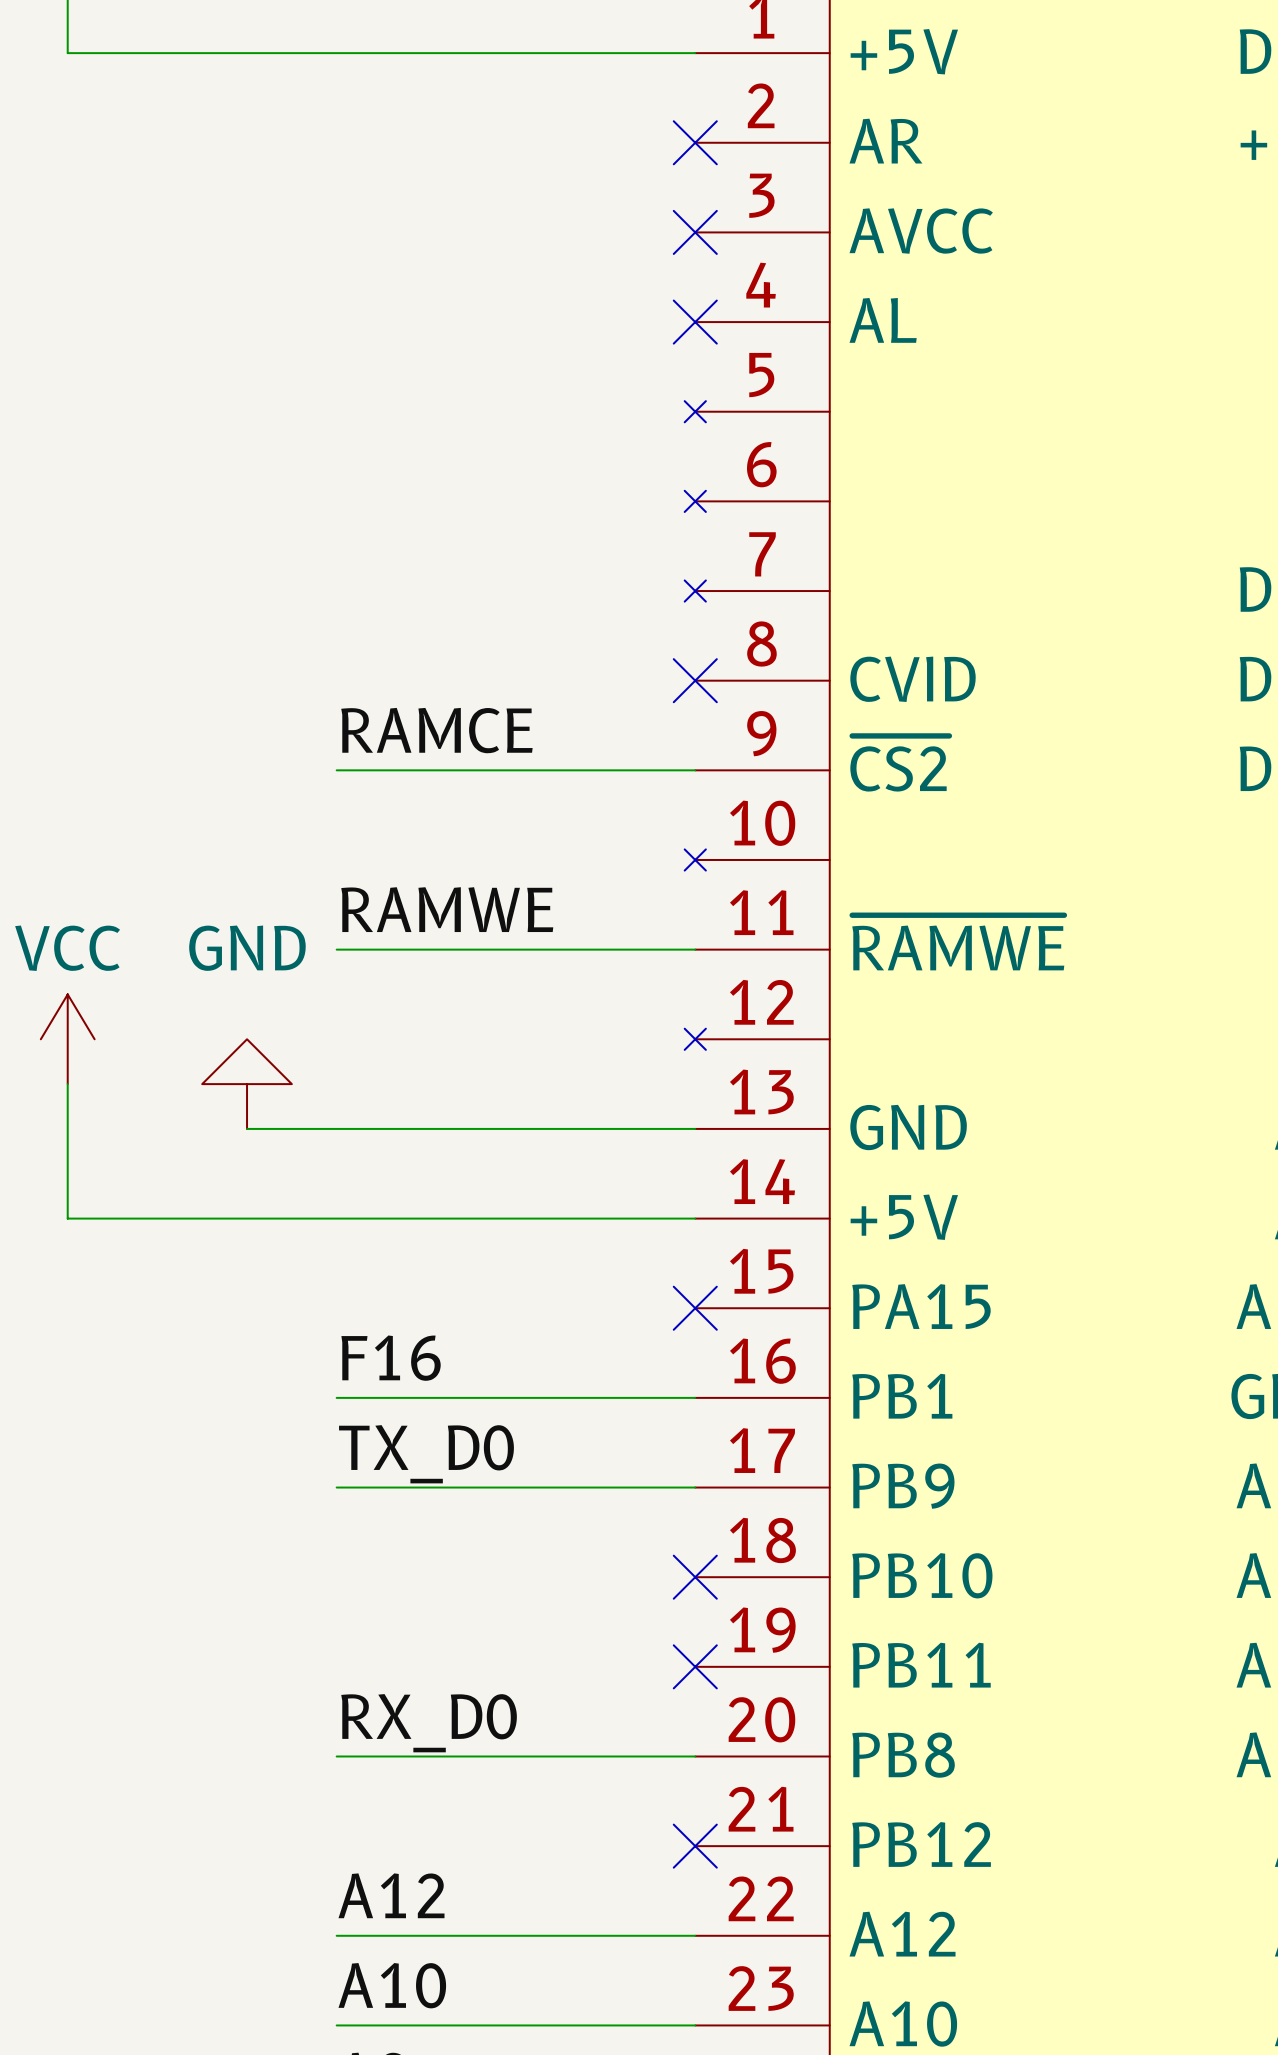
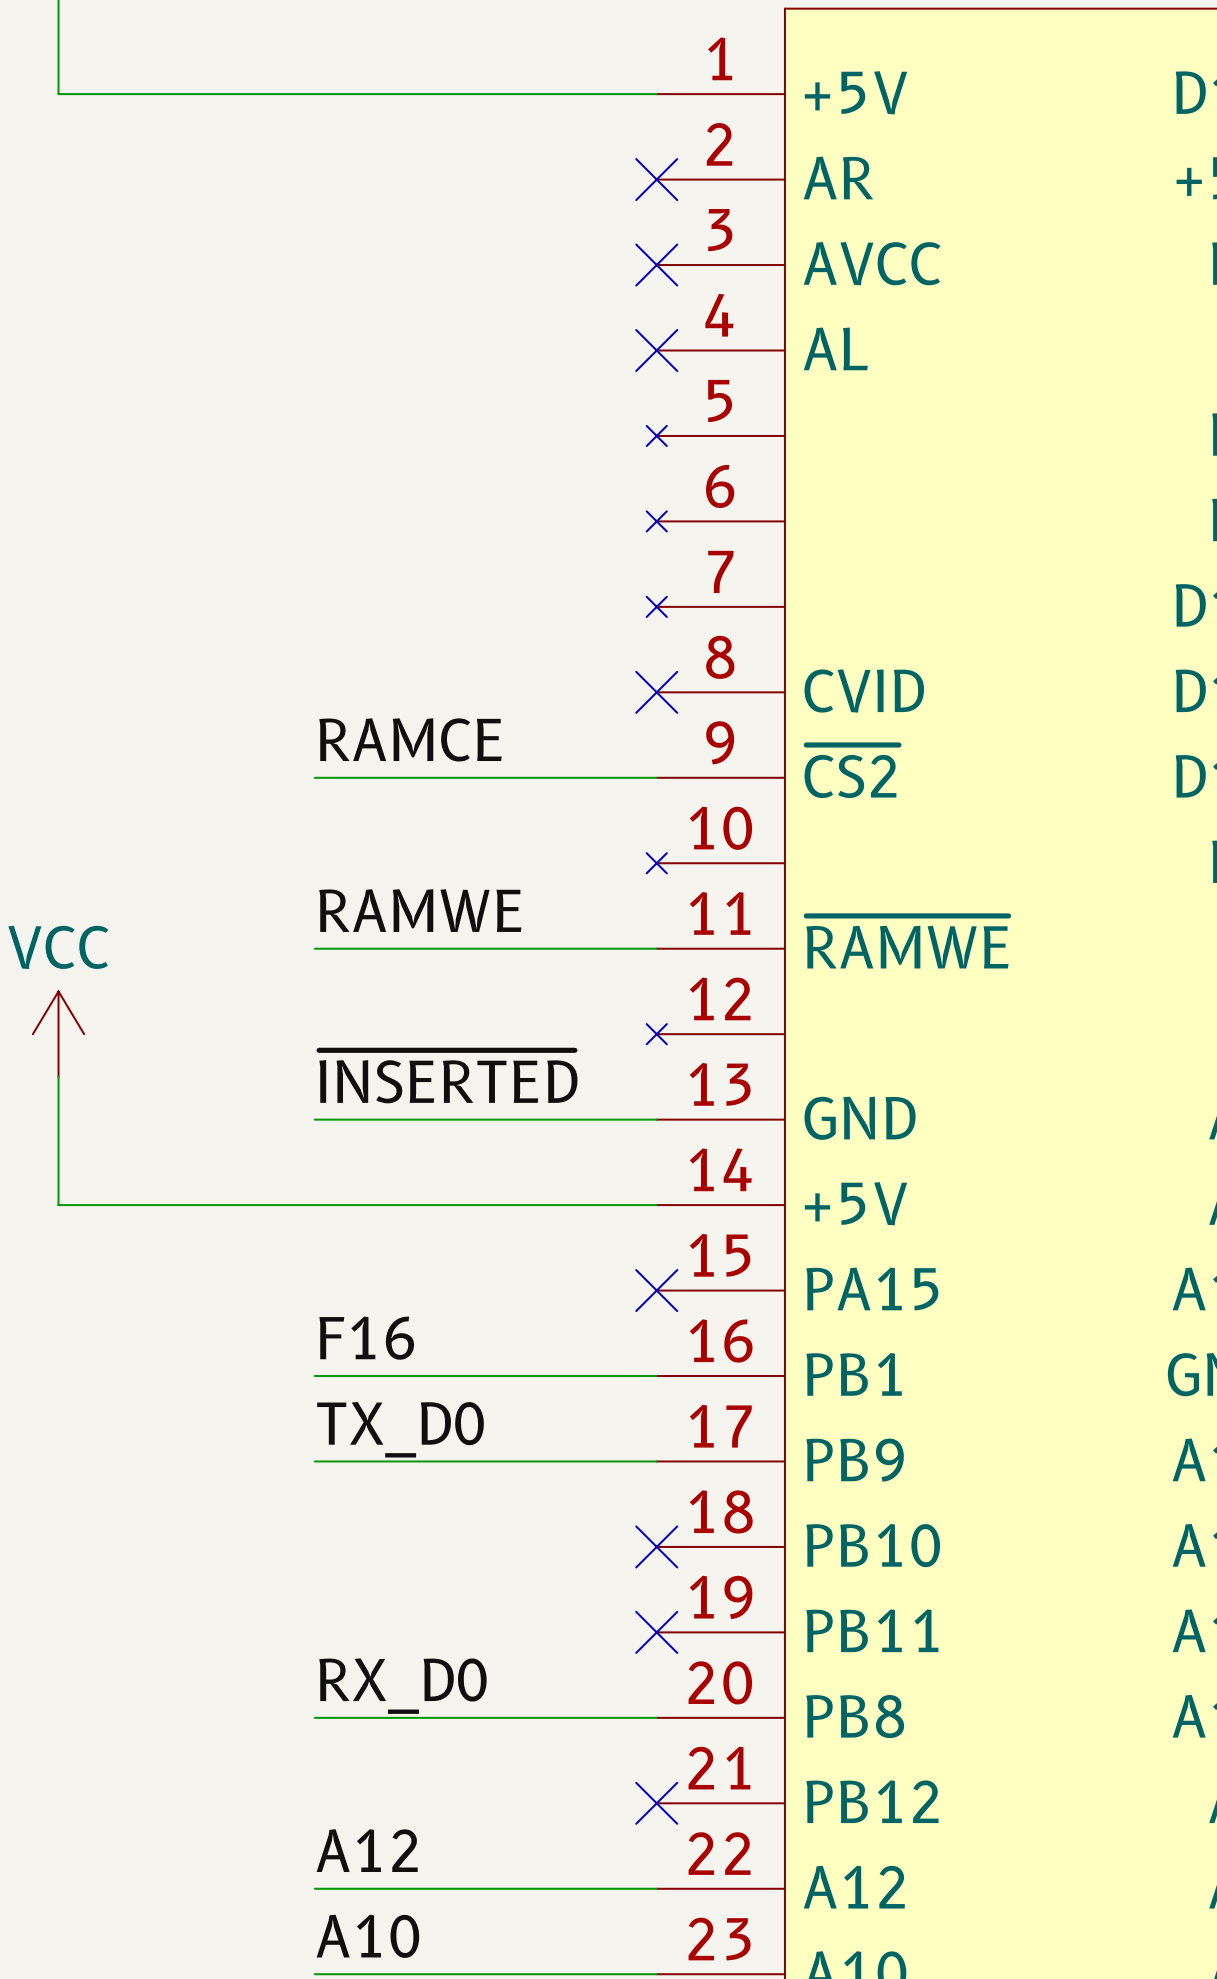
power symbol: GND (247, 1084) -> none
label: none -> ~{INSERTED} (448, 1076)
wire: (247, 1128) (336, 1128) -> none

